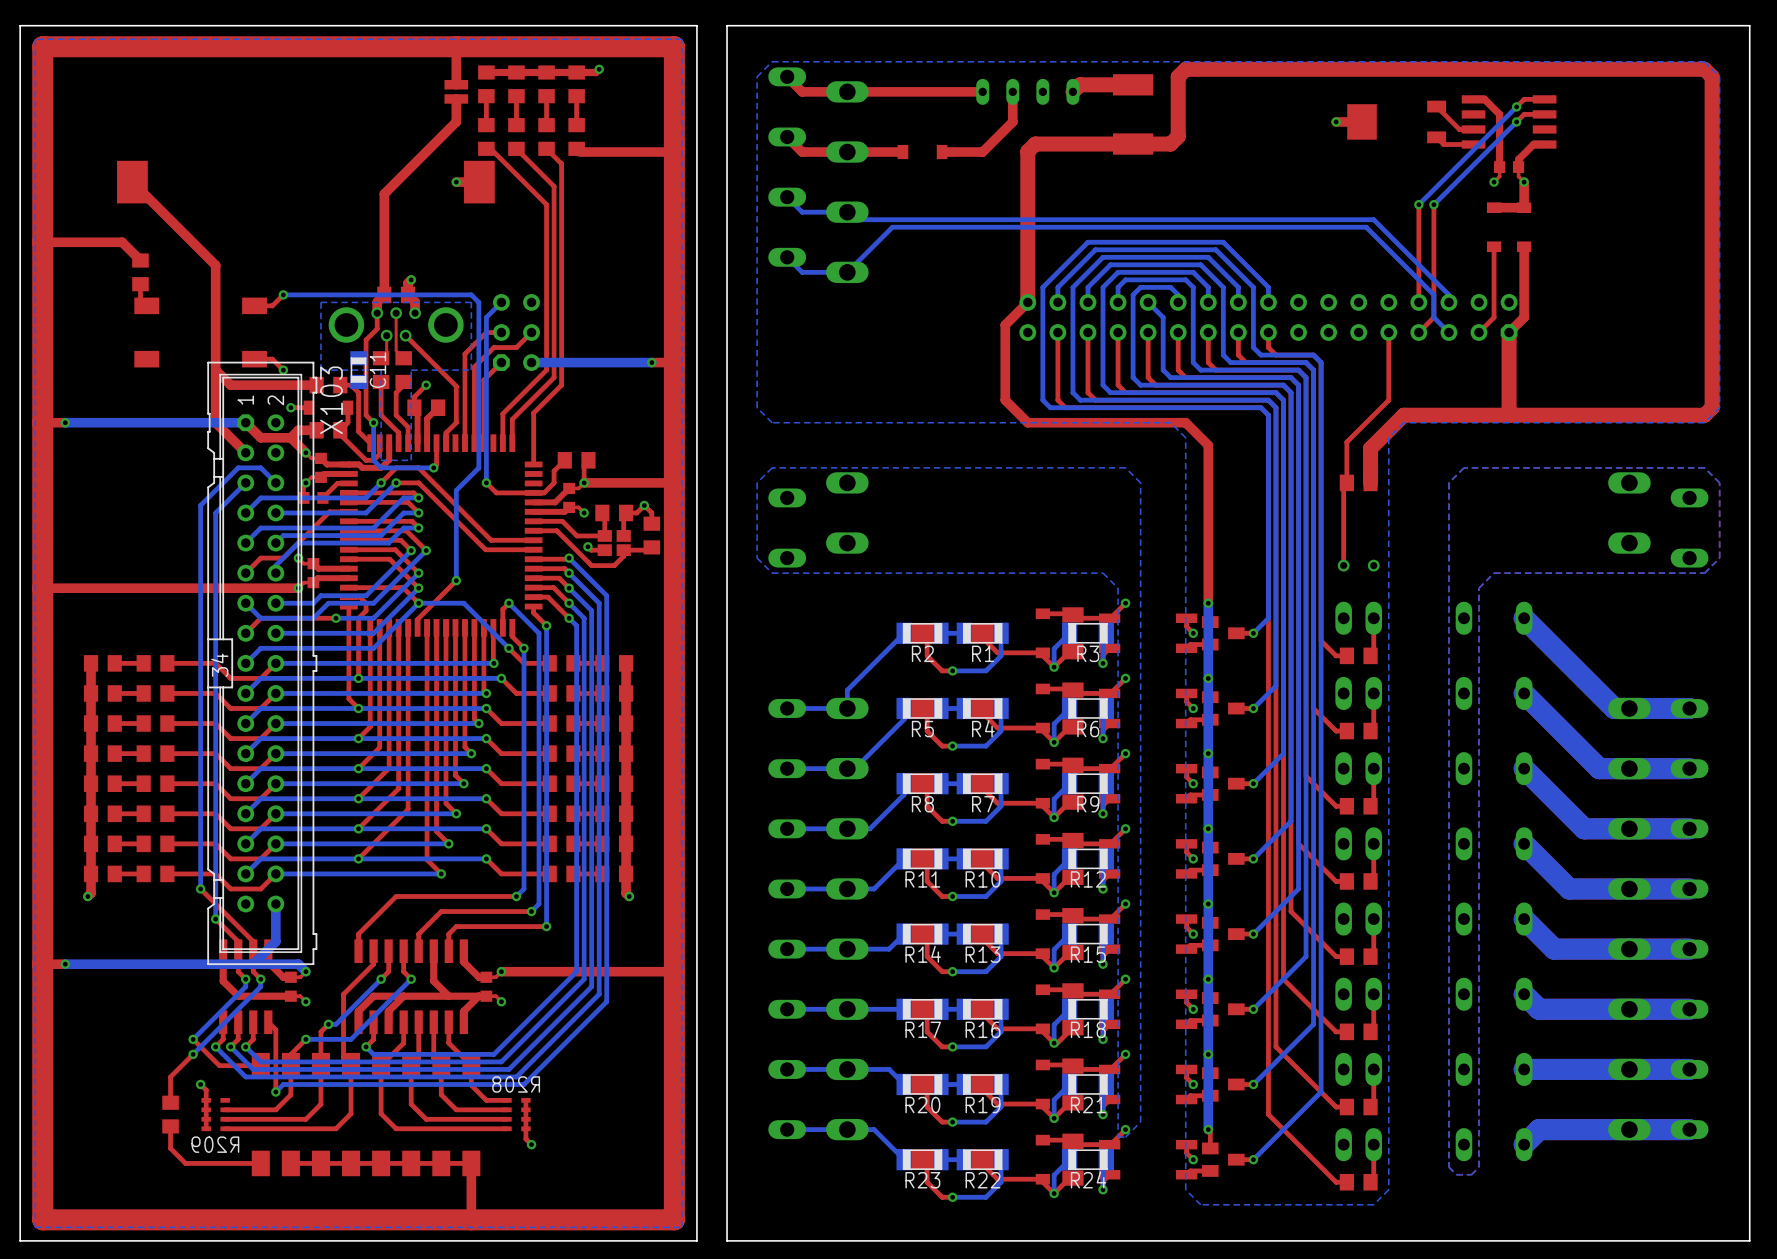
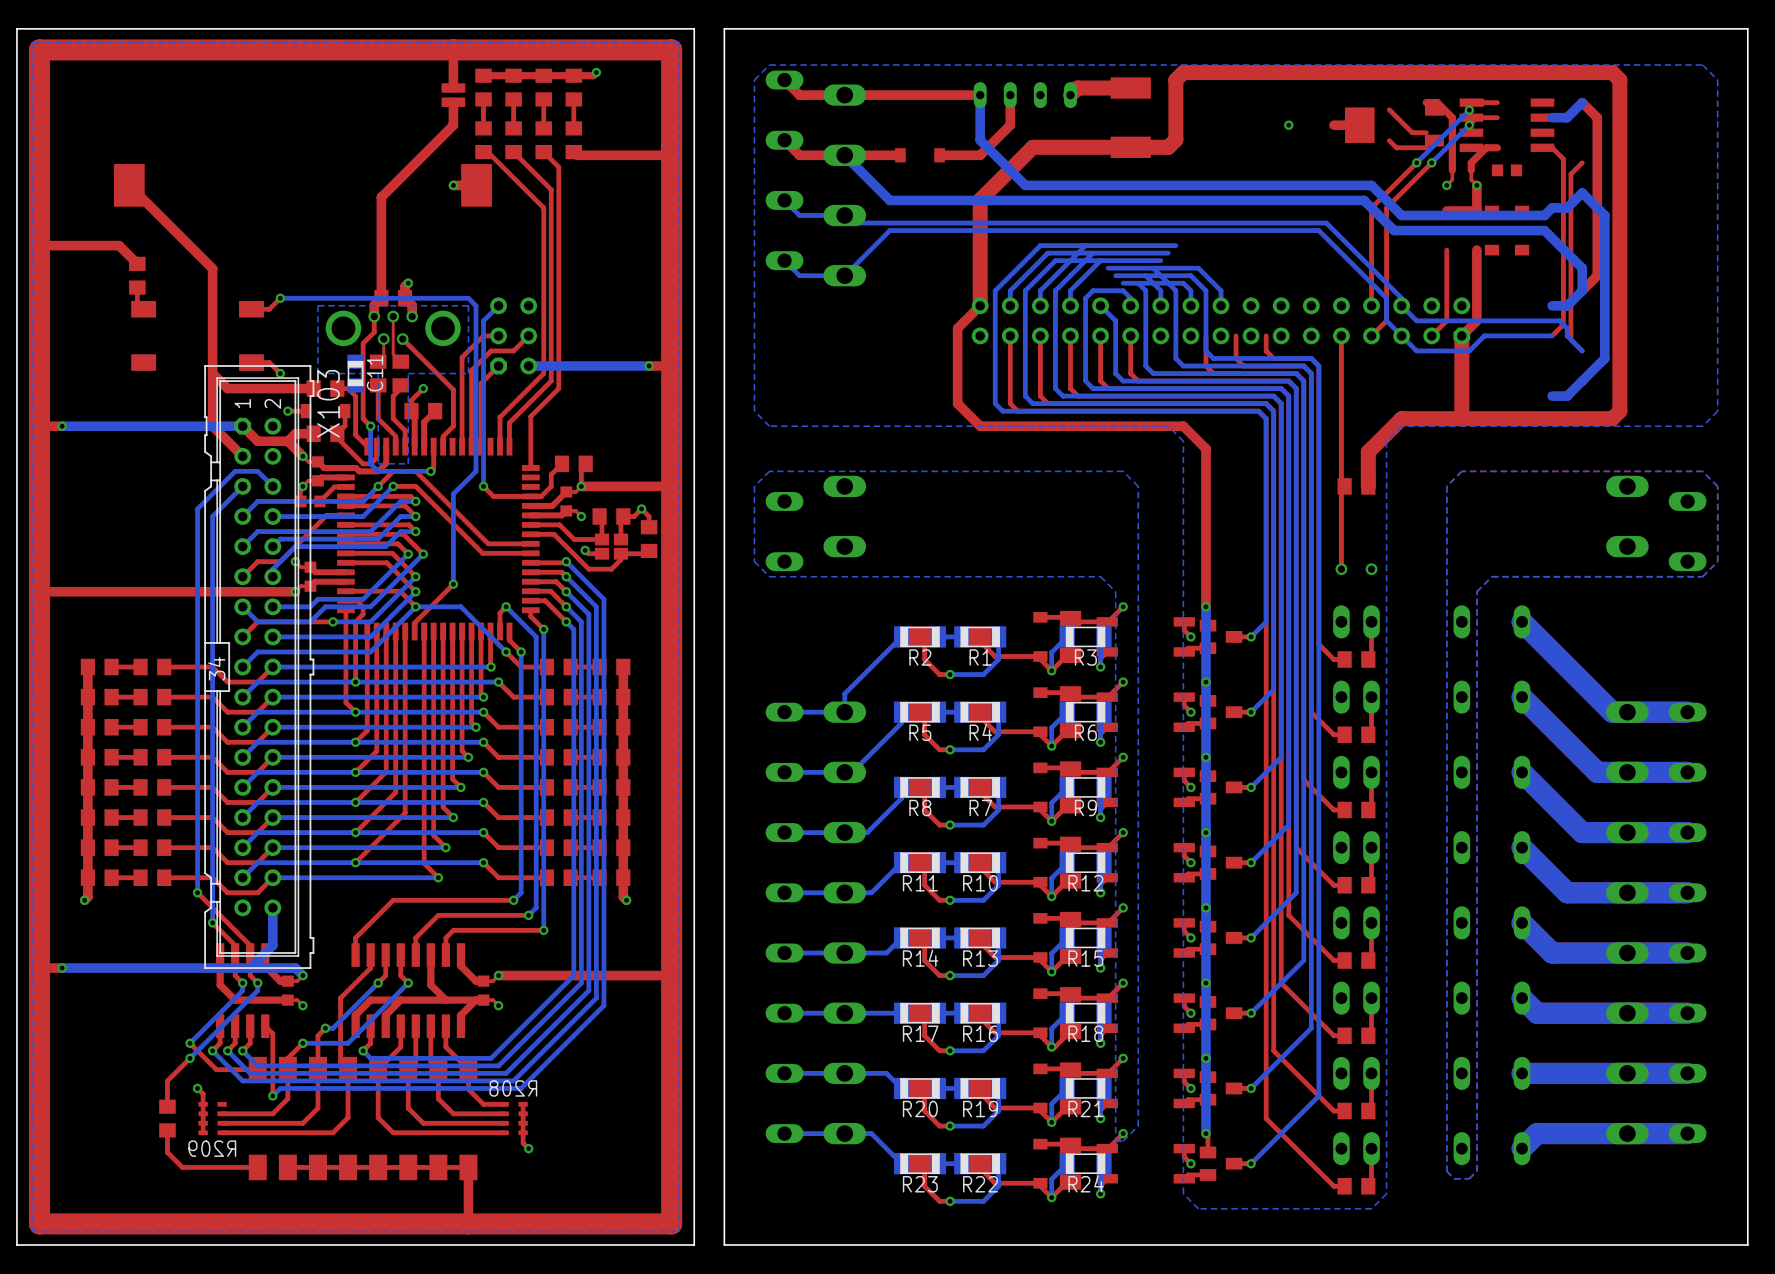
top track: (1614, 69) (1704, 69) (1712, 76) (1712, 407) (1704, 415) (1614, 415) -> (1612, 72) (1619, 80) (1619, 411) (1612, 418)
bottom track: none -> (980, 95) (980, 140) (1025, 185) (1371, 185) (1401, 215) (1544, 215) (1552, 207) (1567, 207) (1582, 192) (1604, 215) (1604, 358) (1567, 396) (1552, 396)
top track: none -> (1426, 102) (1437, 102) (1452, 117) (1452, 179) (1446, 185)
top track: (1484, 99) (1499, 114) (1499, 176) (1494, 182) -> (1482, 102) (1497, 102)
top track: (1544, 99) (1524, 99) (1516, 106) -> none
top track: none -> (1582, 102) (1597, 117) (1597, 275) (1582, 290)
bottom track: none -> (1582, 102) (1567, 117) (1552, 117)
top track: (1436, 106) (1459, 129) (1473, 129) -> (1389, 109) (1412, 132) (1426, 132)
bottom track: none -> (1469, 110) (1416, 162)
via: none -> (1469, 110)
bottom track: (1516, 106) (1418, 204) -> none
via: (1516, 106) -> none
top track: (1544, 114) (1524, 114) (1516, 121) -> (1497, 117) (1476, 117) (1469, 125)
via position: (1336, 121) -> (1288, 125)
bottom track: none -> (1469, 125) (1431, 162)
via: none -> (1469, 125)
bottom track: (1516, 121) (1433, 204) -> none
via: (1516, 121) -> none
top track: (1436, 137) (1443, 144) (1473, 144) -> (1389, 140) (1396, 147) (1426, 147)
top track: (1544, 144) (1533, 144) (1518, 159) (1518, 176) (1524, 182) (1524, 207) (1494, 207) -> (1497, 147) (1486, 147) (1471, 162) (1471, 179) (1476, 185) (1476, 211) (1446, 211)
top track: none -> (1552, 147) (1563, 159) (1563, 324) (1552, 335)
top track: (1027, 151) (1027, 302) (1005, 324) (1005, 400) (1027, 422) -> (1025, 154) (980, 199) (980, 305) (957, 328) (957, 403) (980, 426) (1025, 426)
bottom track: none -> (844, 155) (889, 200) (1364, 200) (1394, 230) (1544, 230) (1582, 268) (1582, 290) (1567, 305) (1552, 305)
top track: none -> (1416, 162) (1371, 207) (1371, 305)
via: none -> (1416, 162)
top track: none -> (1431, 162) (1386, 207) (1386, 320) (1371, 335)
via: none -> (1431, 162)
top track: none -> (1582, 162) (1570, 174) (1570, 339) (1582, 350)
via: none -> (1446, 185)
via position: (1494, 182) -> (1476, 185)
via: (1524, 182) -> none
top track: (1418, 204) (1418, 302) -> none
via: (1418, 204) -> none
top track: (1433, 204) (1433, 317) (1418, 332) -> none
via: (1433, 204) -> none
bottom track: (1328, 219) (1373, 219) (1448, 294) (1448, 302) -> (1326, 223) (1401, 298) (1401, 305) (1416, 320) (1559, 320) (1567, 328) (1567, 335) (1582, 350)
bottom track: (1321, 227) (1366, 227) (1433, 294) (1433, 317) (1448, 332) -> (1318, 230) (1386, 298) (1386, 320) (1416, 350) (1469, 350) (1484, 335) (1552, 335)
bottom track: (1178, 242) (1223, 242) (1268, 287) (1268, 302) -> none
top track: (1494, 246) (1494, 317) (1479, 332) -> (1446, 250) (1446, 320) (1431, 335)
top track: (1524, 246) (1524, 317) (1509, 332) (1509, 415) -> (1476, 250) (1476, 320) (1461, 335) (1461, 418)
bottom track: none -> (1093, 253) (1047, 253) (1010, 290) (1010, 305)
bottom track: (1170, 249) (1215, 249) (1253, 287) (1253, 347) (1260, 355) -> (1205, 305) (1205, 350) (1213, 358) (1258, 358)
bottom track: (1163, 257) (1208, 257) (1238, 287) (1238, 302) -> none
bottom track: (1110, 264) (1087, 287) (1087, 294) -> (1130, 298) (1123, 290) (1093, 290) (1085, 298)
bottom track: (1118, 272) (1103, 287) (1103, 385) (1110, 392) -> (1055, 305) (1055, 388) (1062, 396) (1108, 396)
bottom track: none -> (1145, 275) (1160, 290) (1160, 305)
bottom track: (1125, 279) (1118, 287) (1118, 302) -> none
bottom track: (1178, 294) (1170, 287) (1140, 287) (1133, 294) -> (1175, 298) (1175, 290) (1153, 268)
bottom track: (1042, 302) (1042, 400) (1050, 407) -> (1085, 245) (1040, 245) (995, 290) (995, 403) (1002, 411) (1047, 411)
bottom track: (1072, 302) (1072, 392) (1080, 400) -> (1100, 260) (1055, 260) (1025, 290) (1025, 396) (1032, 403) (1078, 403)
bottom track: (1133, 302) (1133, 377) (1140, 385) -> (1085, 305) (1085, 381) (1093, 388) (1138, 388)
bottom track: (1148, 302) (1163, 317) (1163, 370) (1170, 377) -> (1100, 305) (1115, 320) (1115, 373) (1123, 381) (1168, 381)
bottom track: (1193, 302) (1193, 362) (1200, 370) -> (1138, 283) (1145, 290) (1145, 366) (1153, 373) (1198, 373)
bottom track: (1223, 302) (1223, 355) (1230, 362) -> (1175, 305) (1175, 358) (1183, 366) (1228, 366)
part position: (1268, 317) -> (1221, 320)
top track: (1057, 332) (1057, 400) (1065, 407) -> (1010, 335) (1010, 403) (1017, 411) (1062, 411)
top track: (1087, 332) (1087, 392) (1095, 400) -> (1040, 335) (1040, 396) (1047, 403) (1093, 403)
top track: (1118, 332) (1118, 385) (1125, 392) -> (1070, 335) (1070, 388) (1078, 396) (1123, 396)
top track: (1148, 332) (1148, 377) (1155, 385) -> (1100, 335) (1100, 381) (1108, 388) (1153, 388)
top track: (1178, 332) (1178, 370) (1185, 377) -> (1130, 335) (1130, 373) (1138, 381) (1183, 381)
top track: (1388, 332) (1388, 400) (1346, 442) (1346, 482) -> (1341, 335) (1341, 483) (1344, 486)

